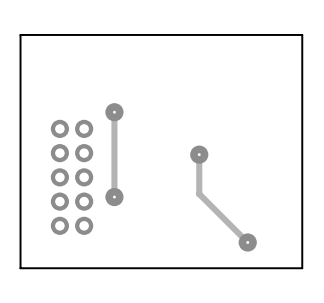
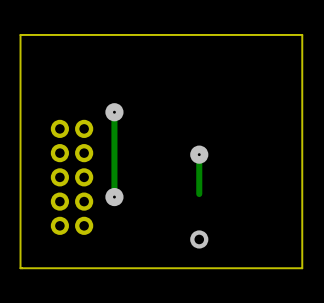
track: (199, 194) (247, 242) -> none
via: none -> (199, 239)
via: (247, 242) -> none

